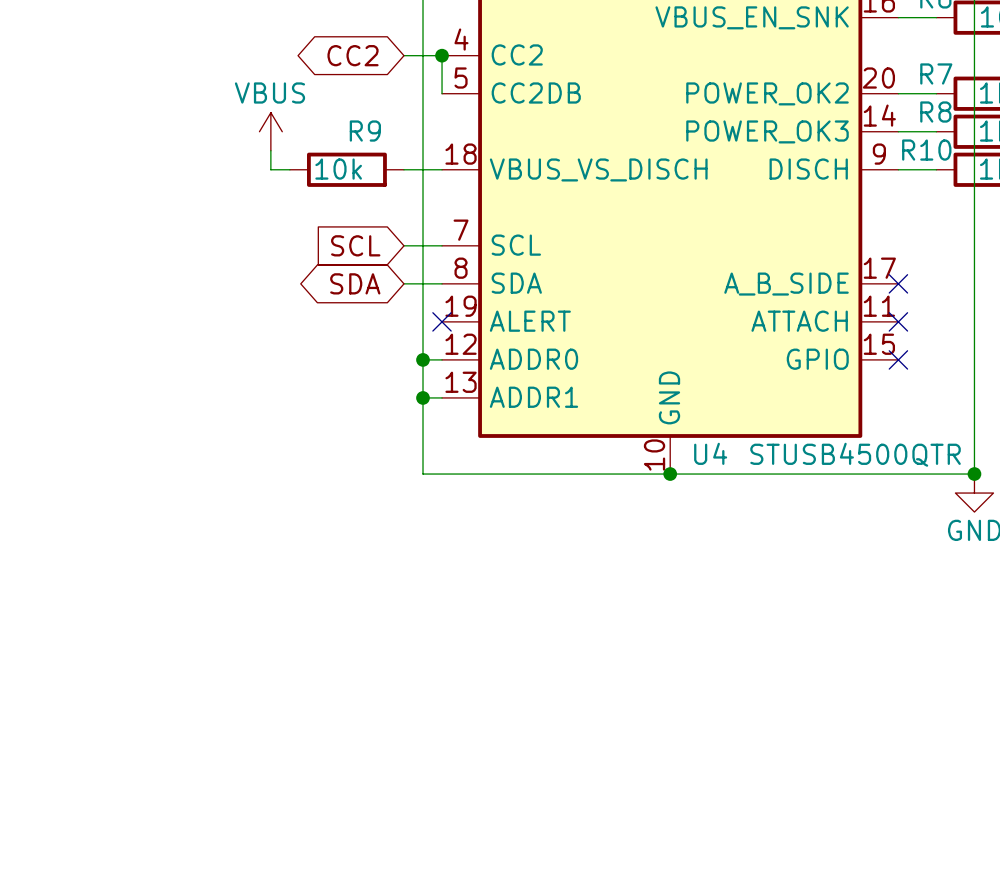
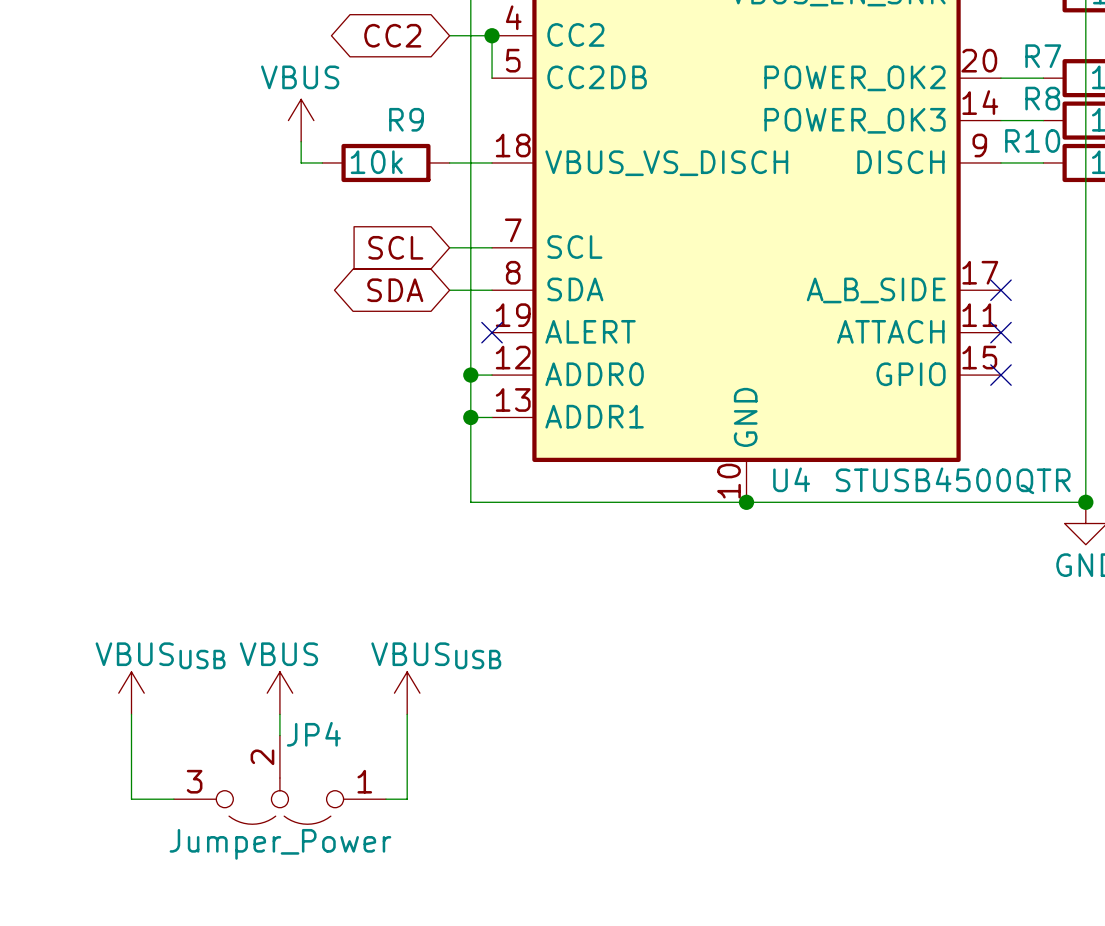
power symbol: none -> VBUSUSB (131, 693)
power symbol: none -> VBUS (279, 693)
power symbol: none -> VBUSUSB (407, 693)
wire: none -> (131, 714) (131, 799) (173, 799)
wire: none -> (279, 714) (279, 735)
wire: none -> (407, 714) (407, 799) (385, 799)
JP4: none -> Jumper_Power (279, 779)

